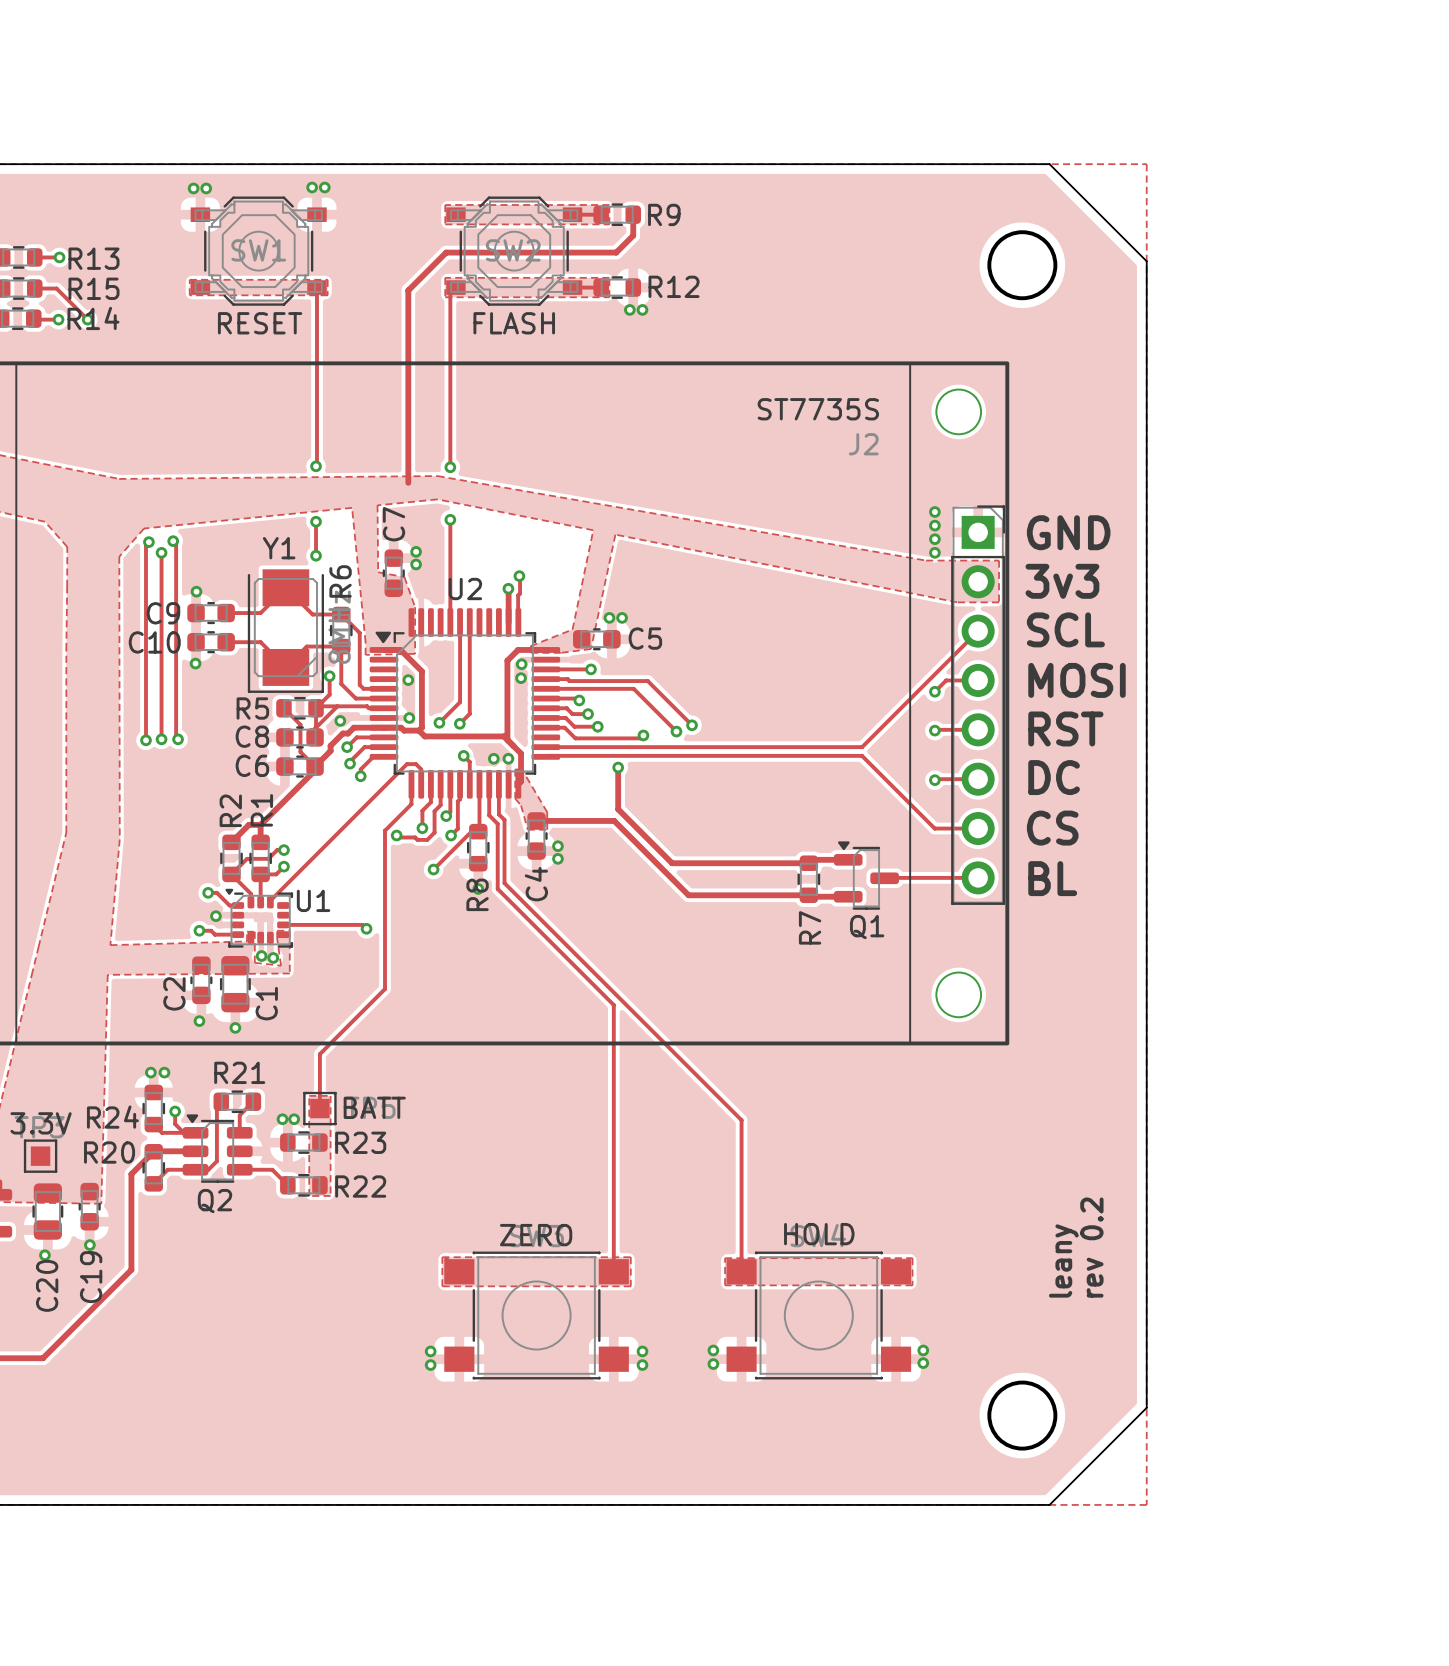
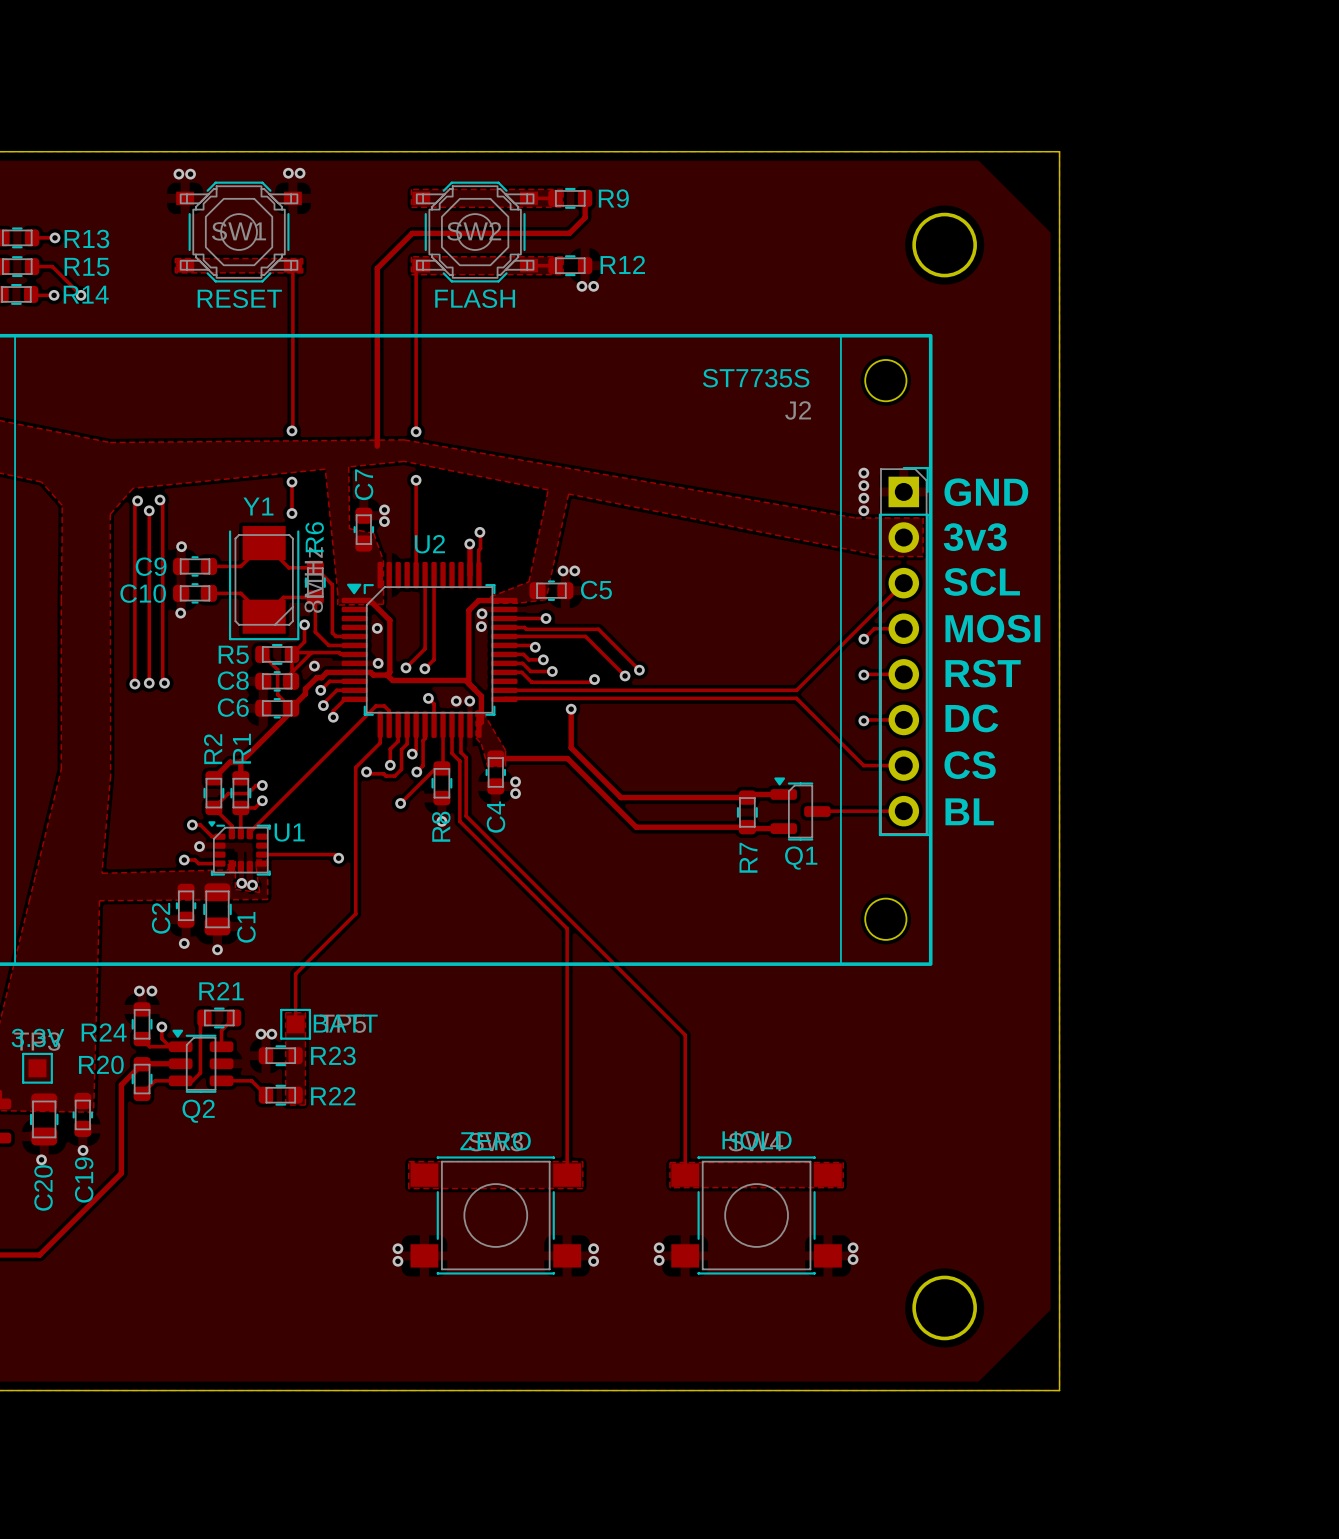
board edge: (1049, 164) (1146, 261) -> (969, 151) (1059, 151) (1059, 241)
text: rev 0.2 (1091, 1247) -> none
text: leany (1063, 1260) -> none
board edge: (1146, 1407) (1049, 1504) -> (1059, 1300) (1059, 1390) (969, 1390)

